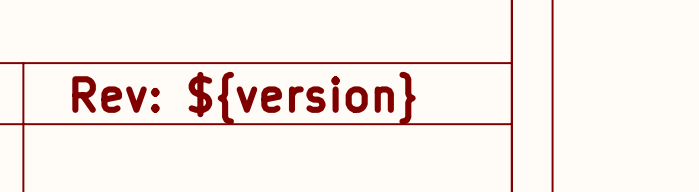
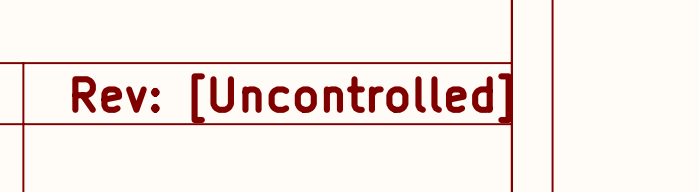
title block: Rev: ${version} (244, 98) -> Rev: [Uncontrolled] (291, 98)

